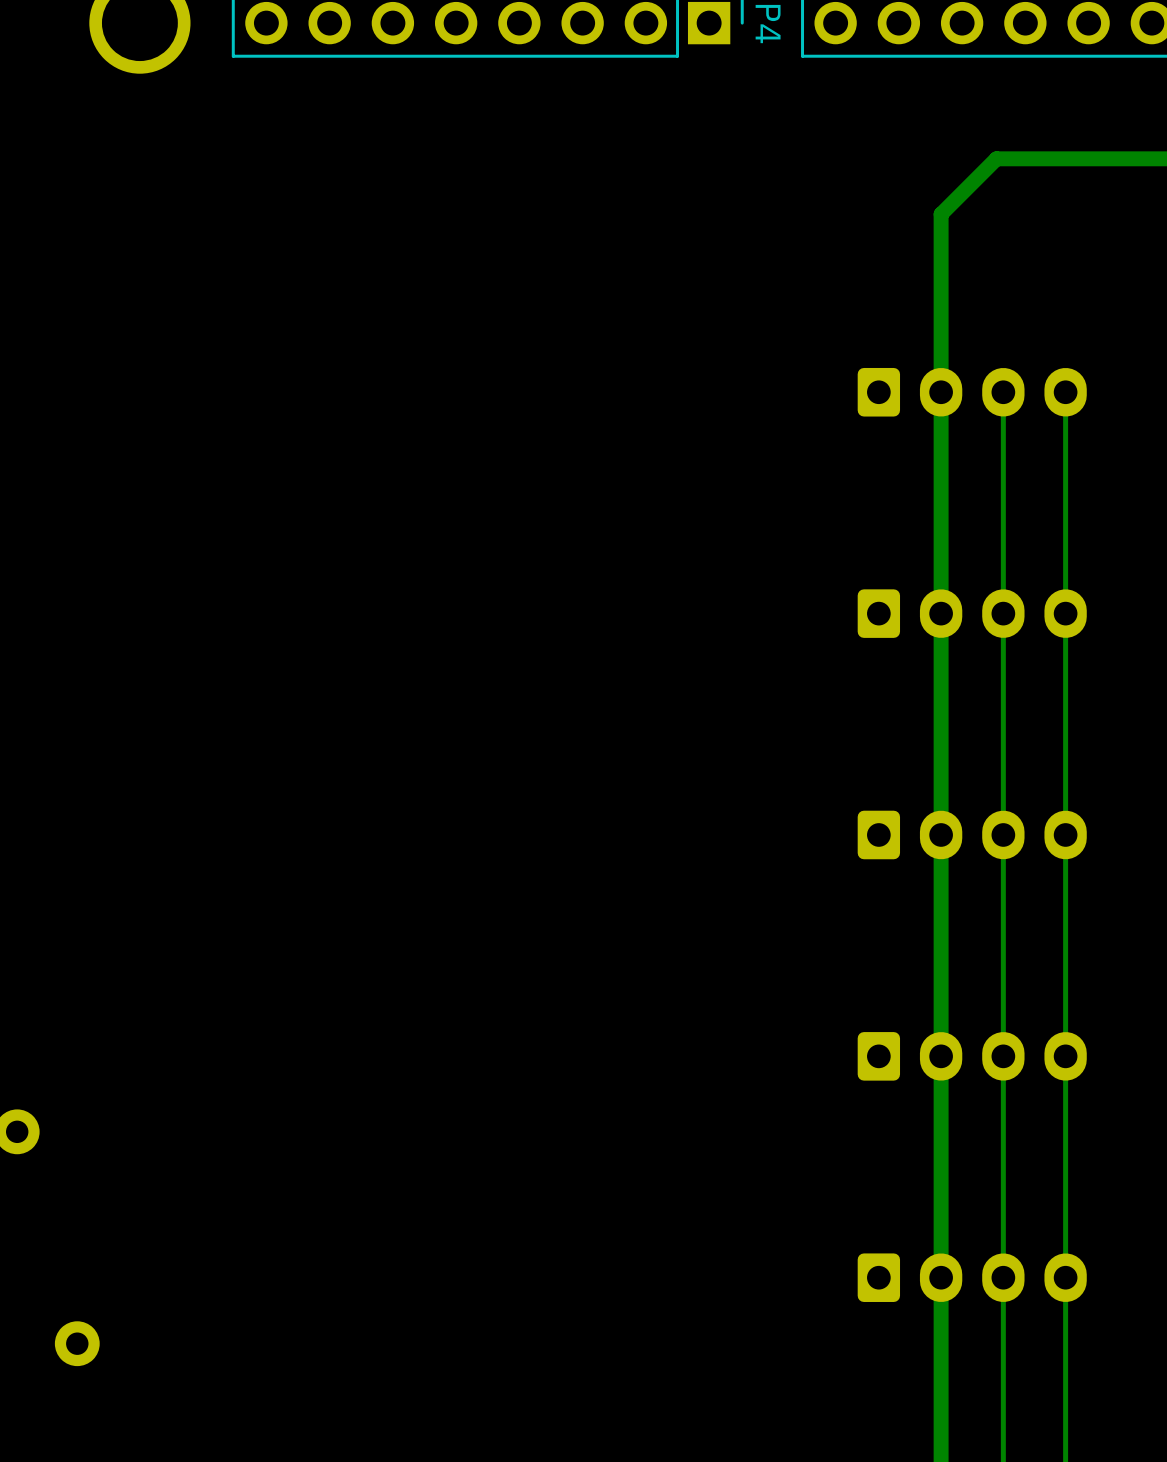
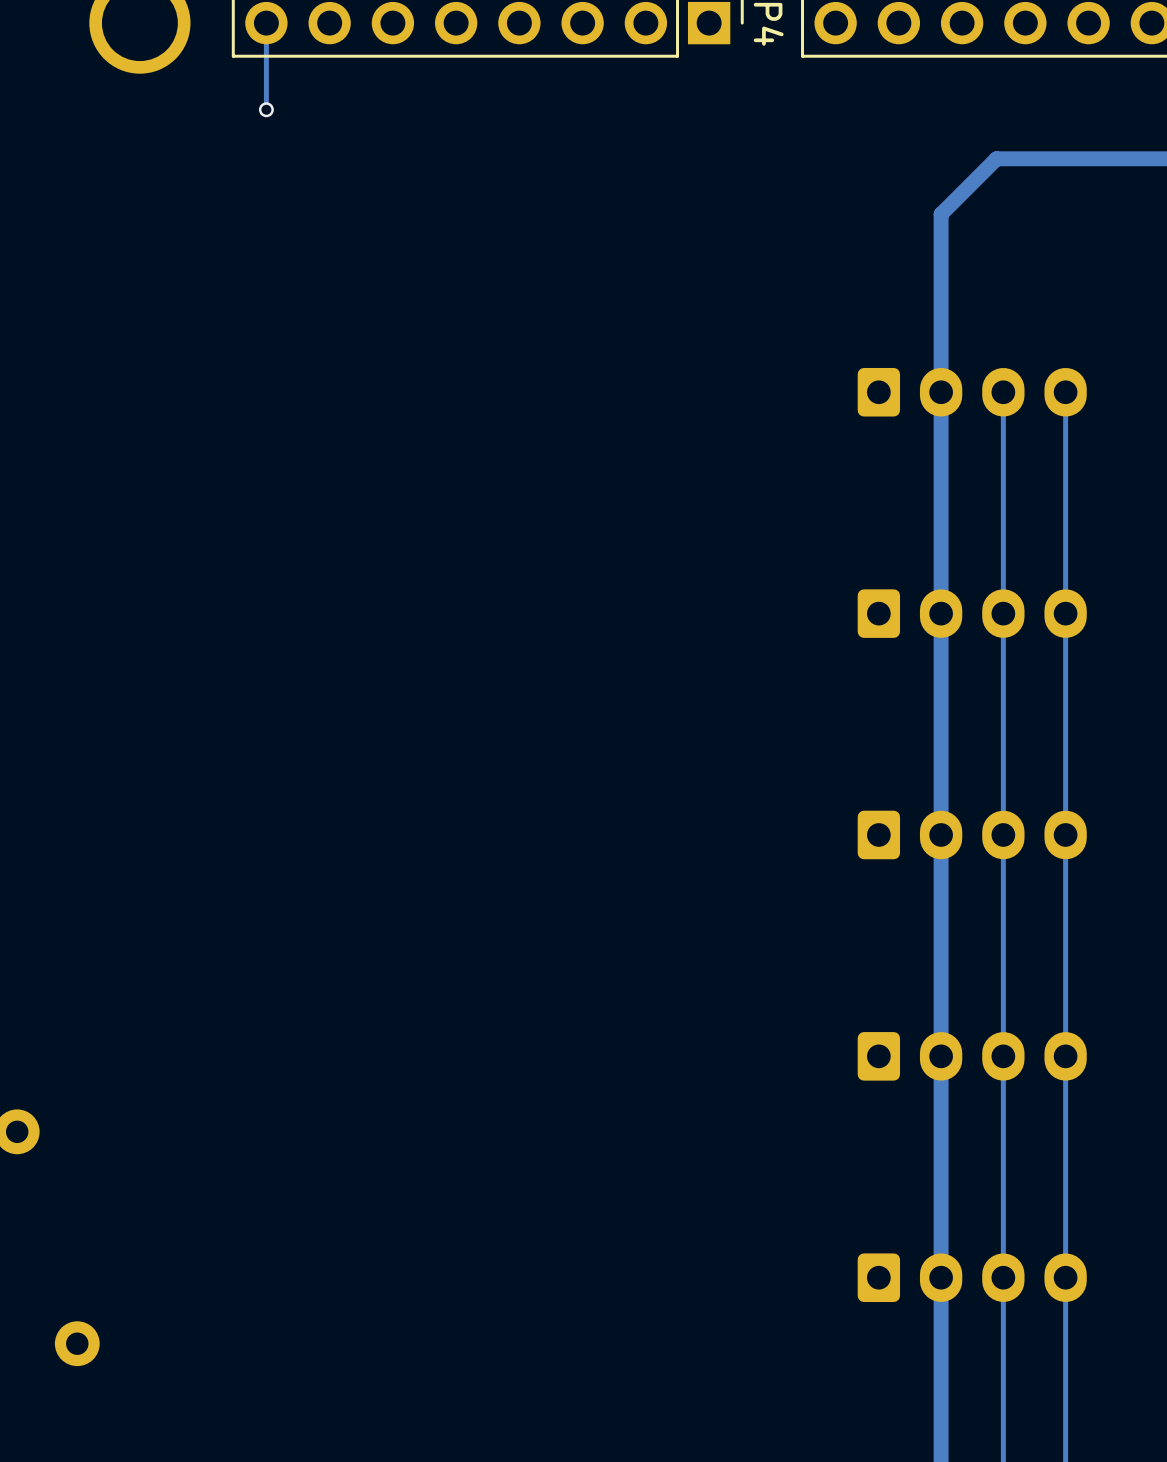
track: none -> (266, 23) (265, 110)
via: none -> (266, 109)

